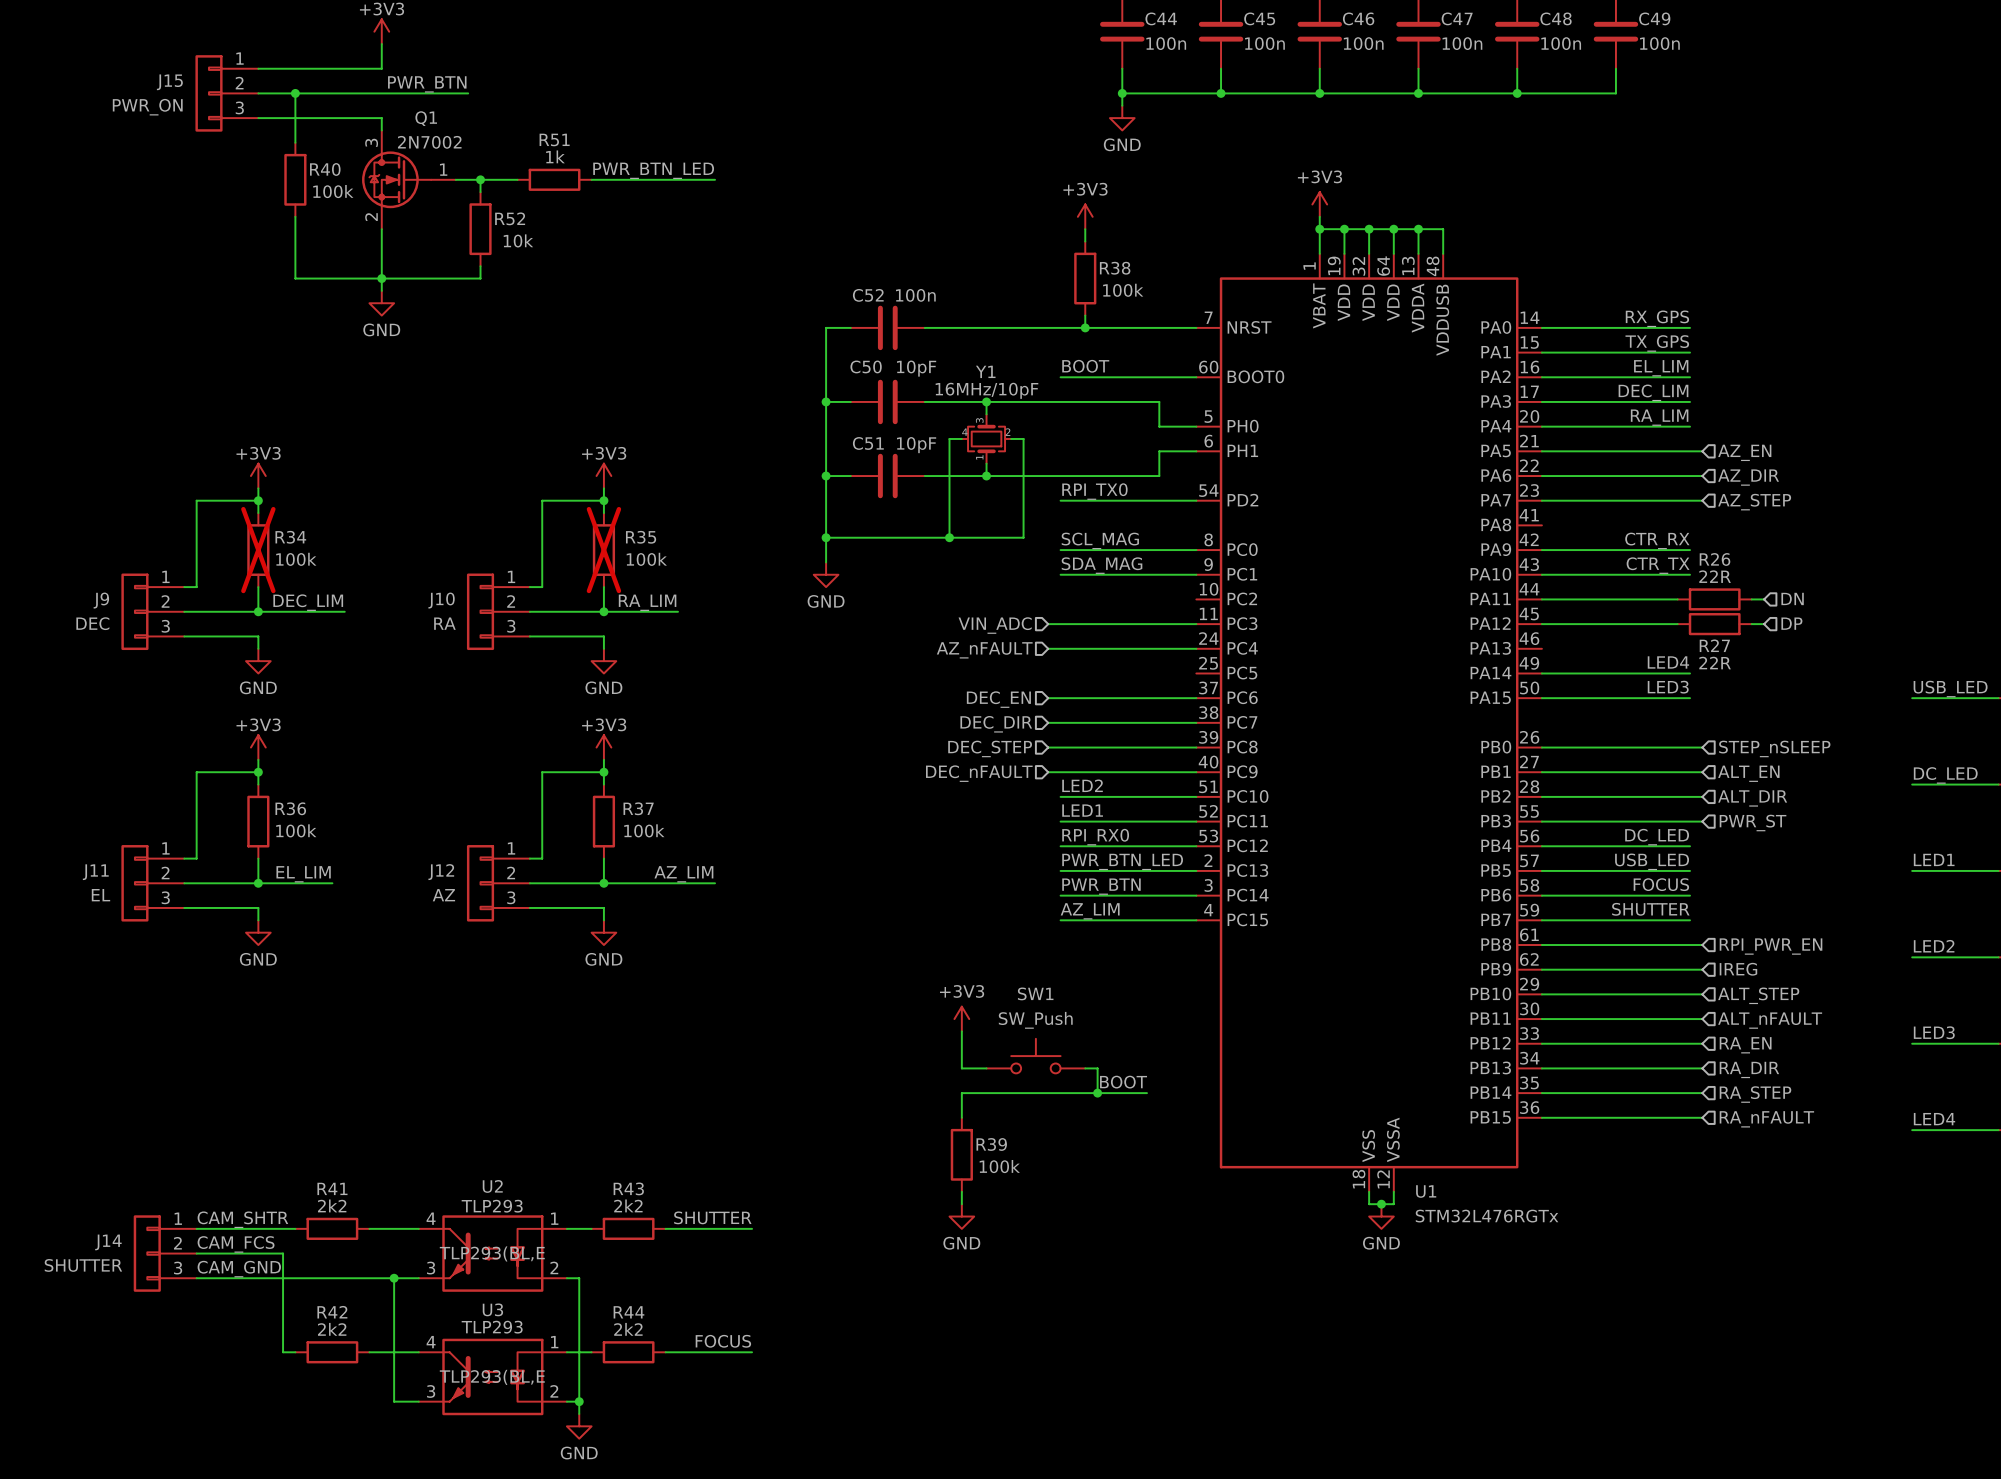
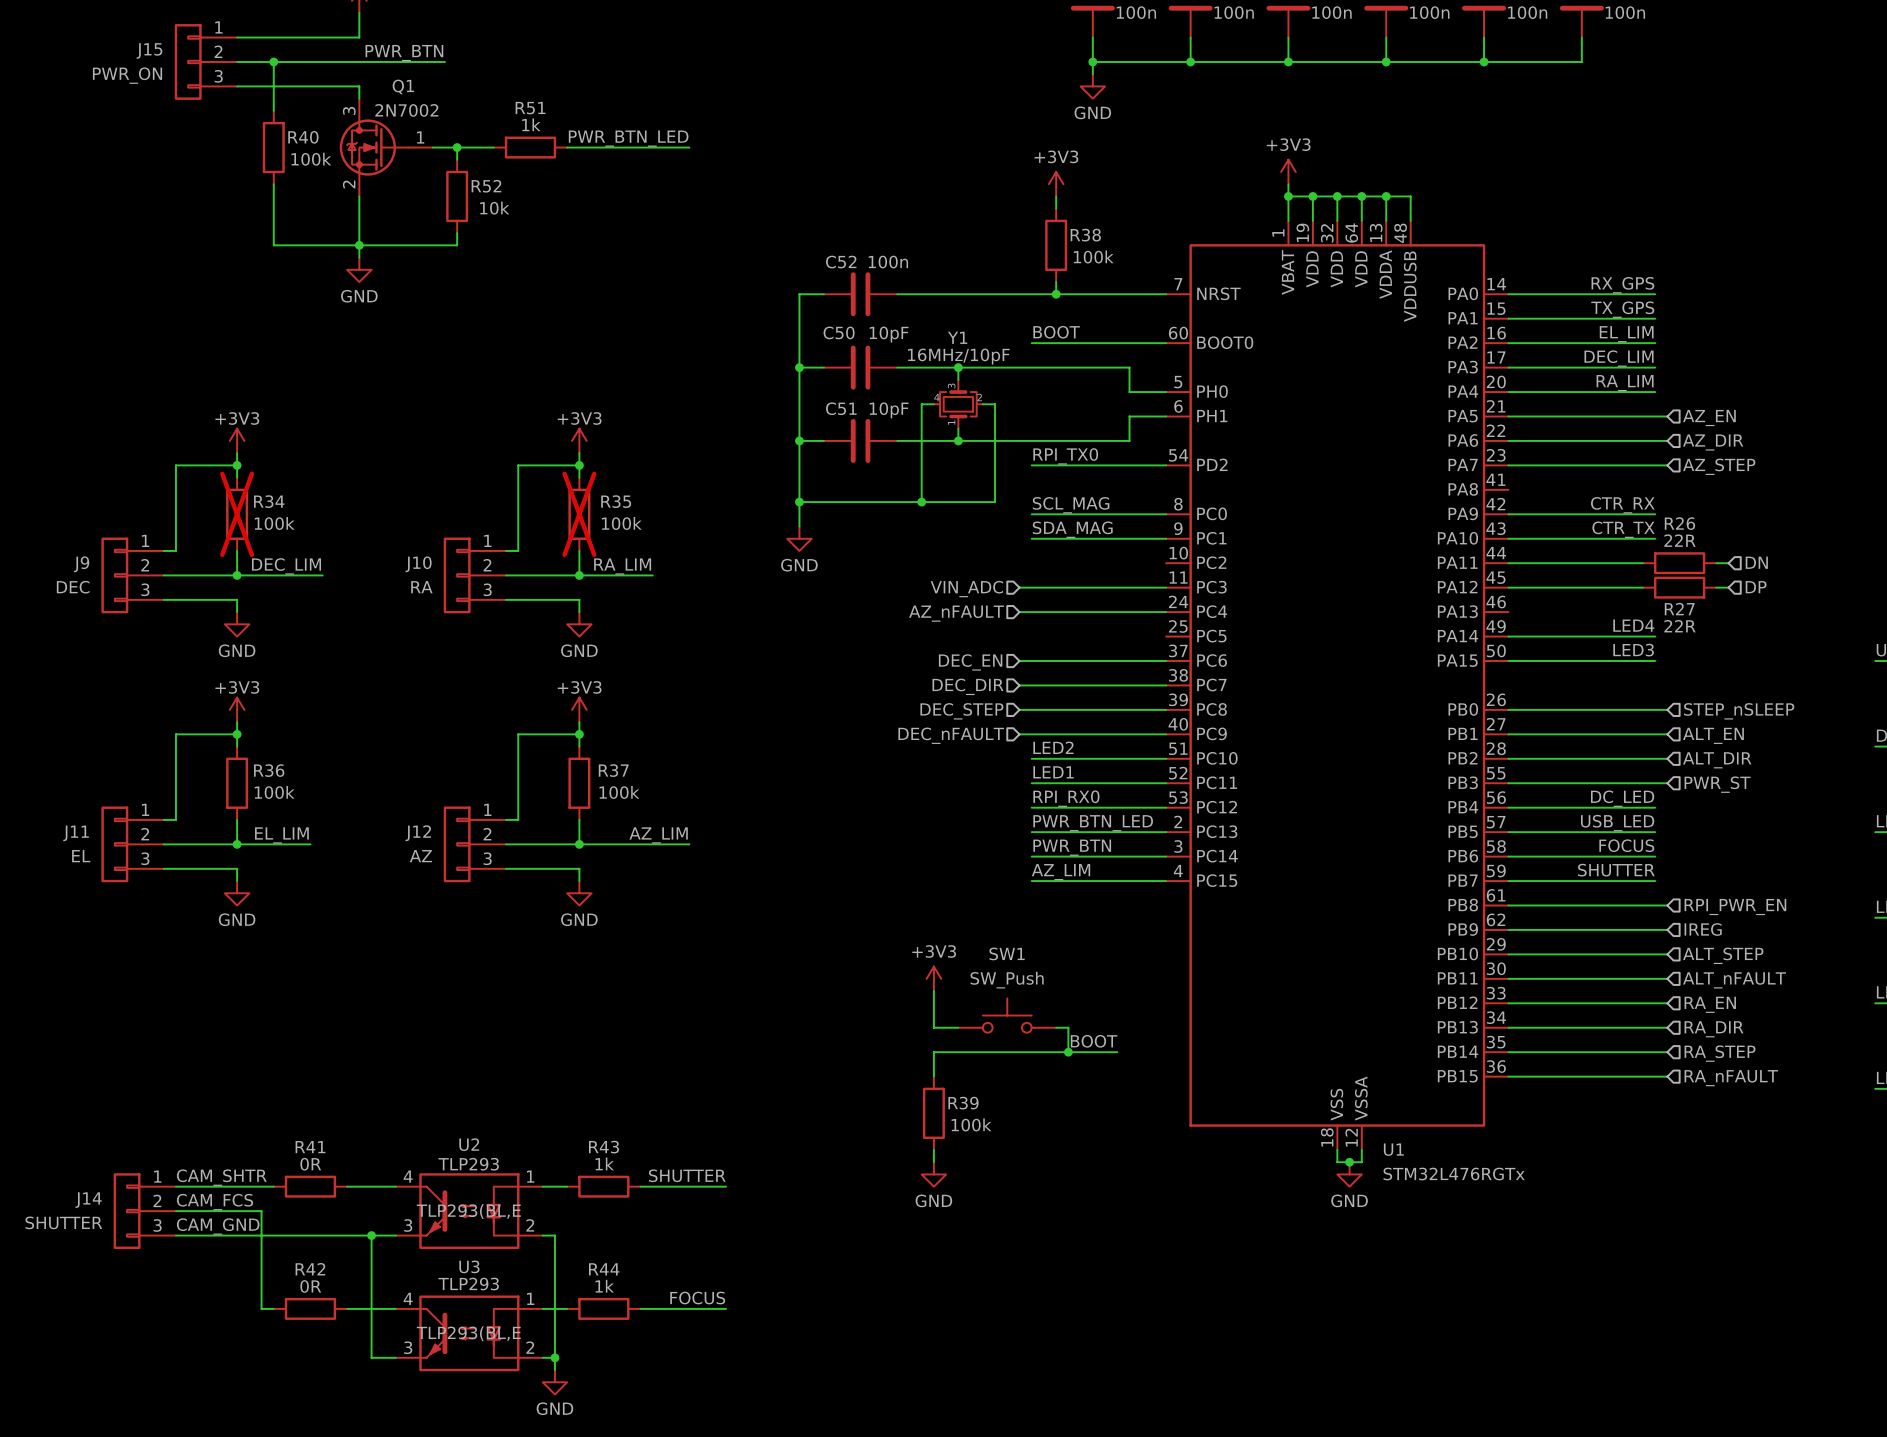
R41 value: 2k2 (332, 1205) -> 0R (310, 1164)
R43 value: 2k2 (628, 1205) -> 1k (604, 1163)
R42 value: 2k2 (332, 1329) -> 0R (310, 1286)
R44 value: 2k2 (628, 1329) -> 1k (604, 1286)

